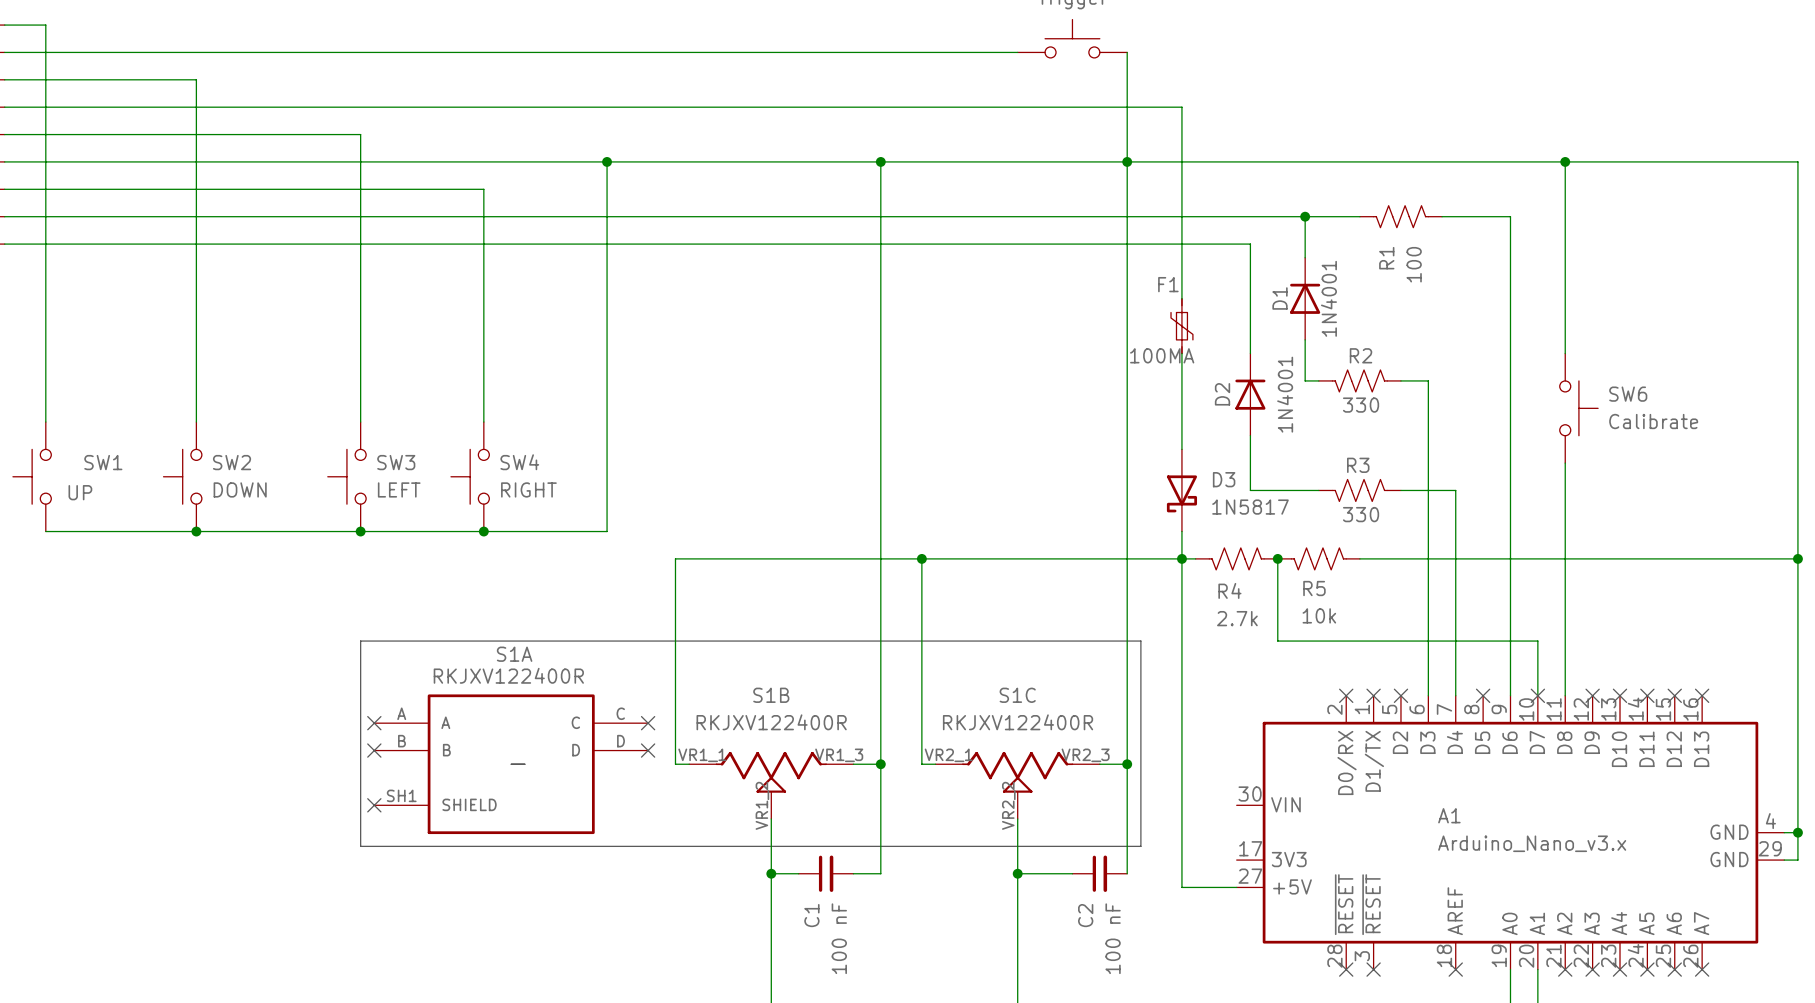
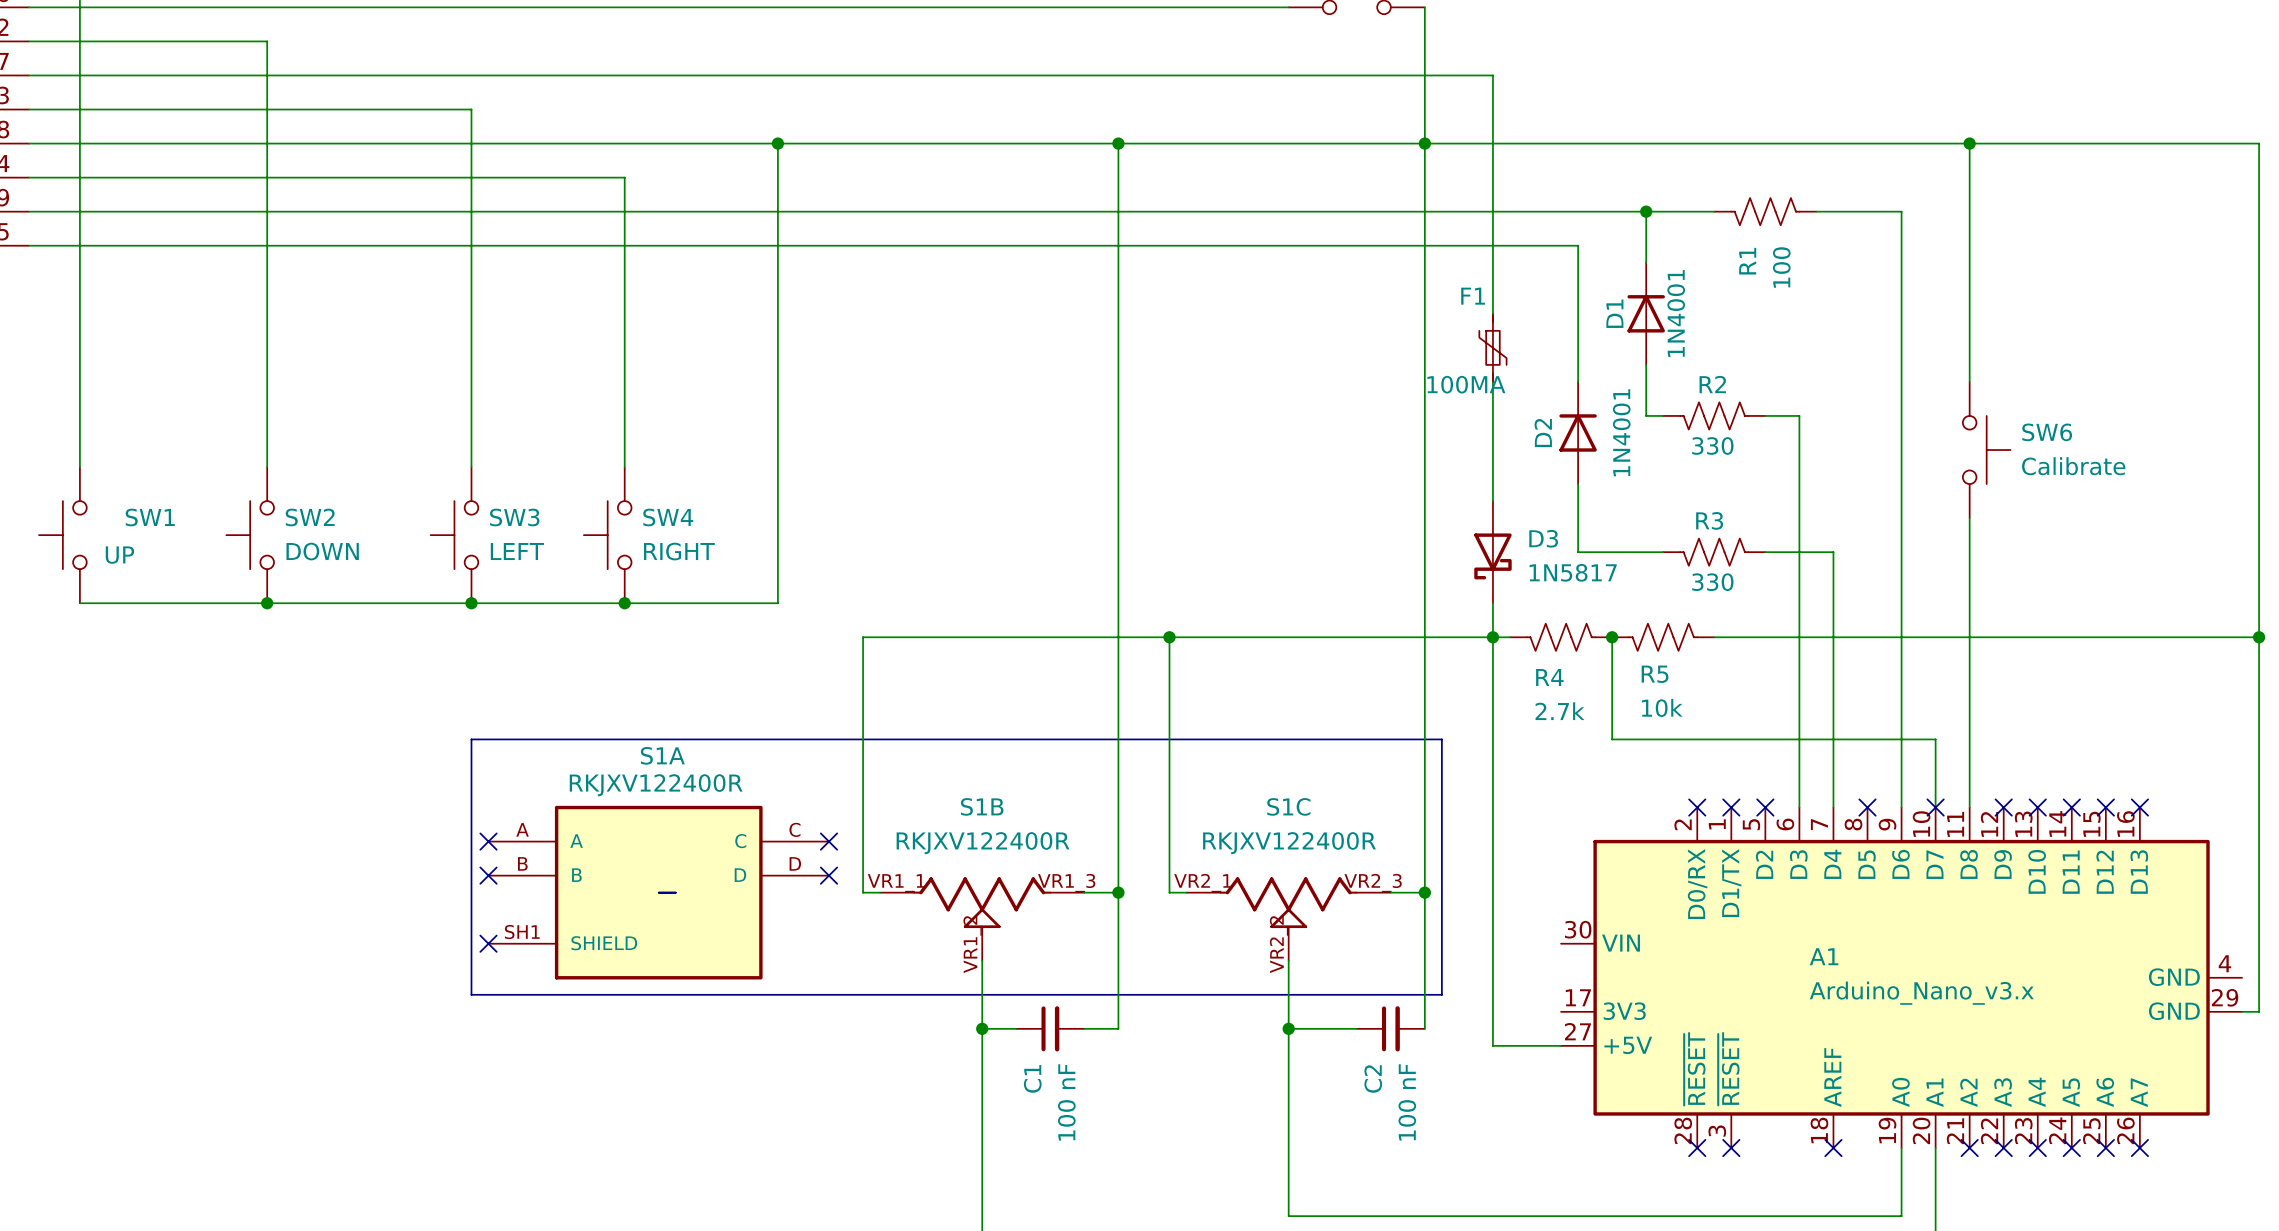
wire: (1784, 832) (1797, 832) -> none
junction: (1797, 832) -> none

